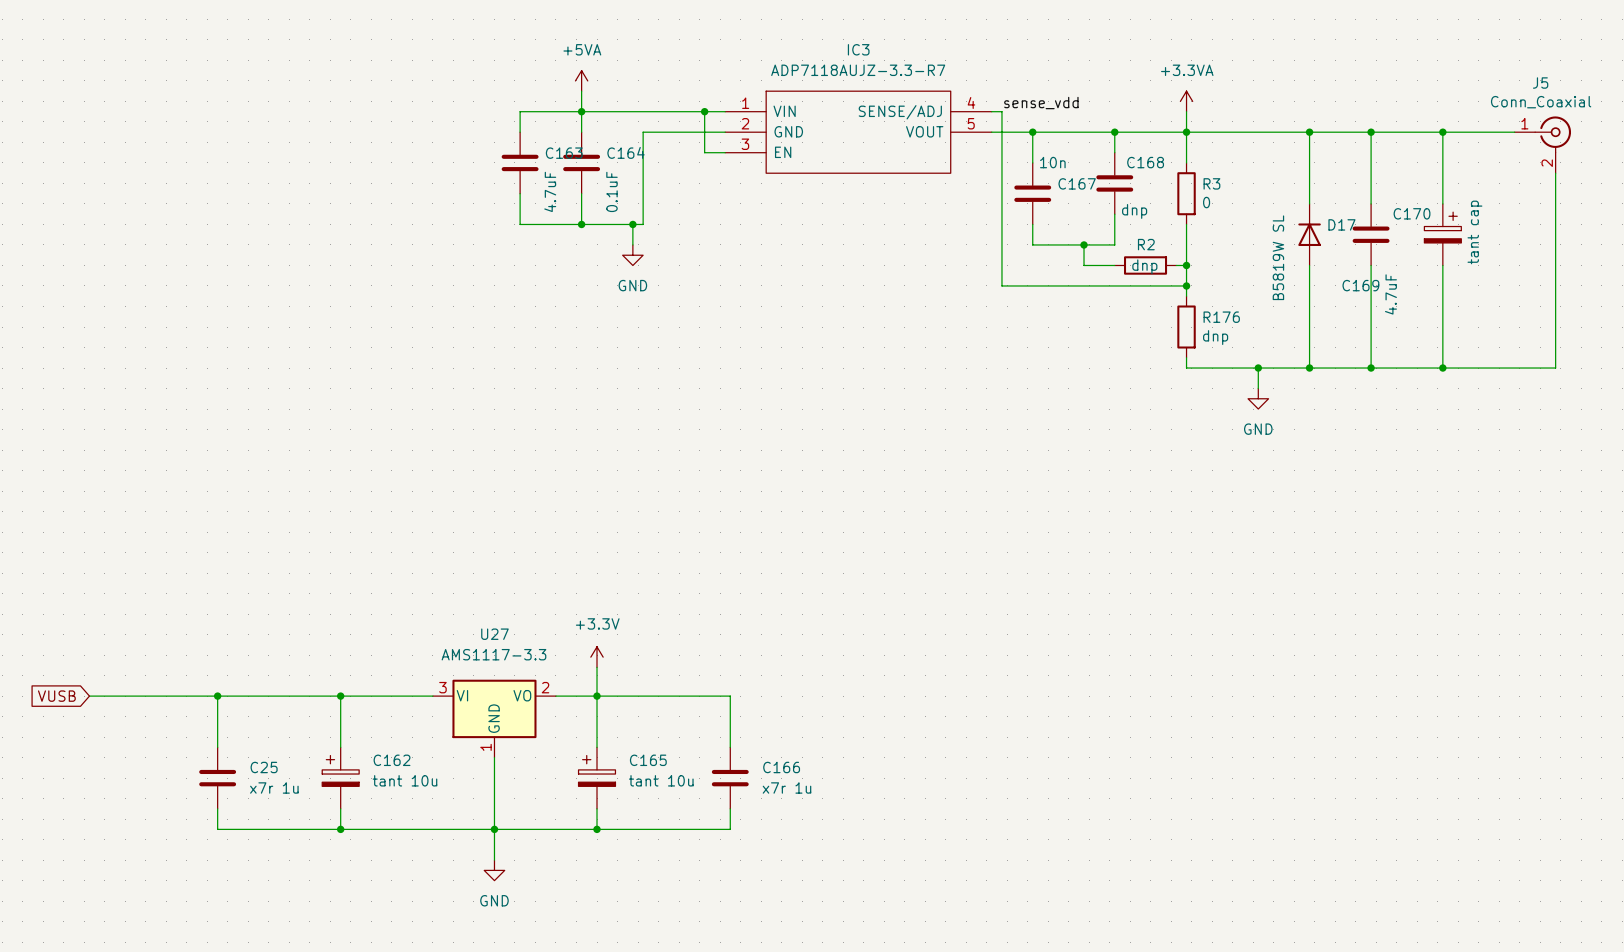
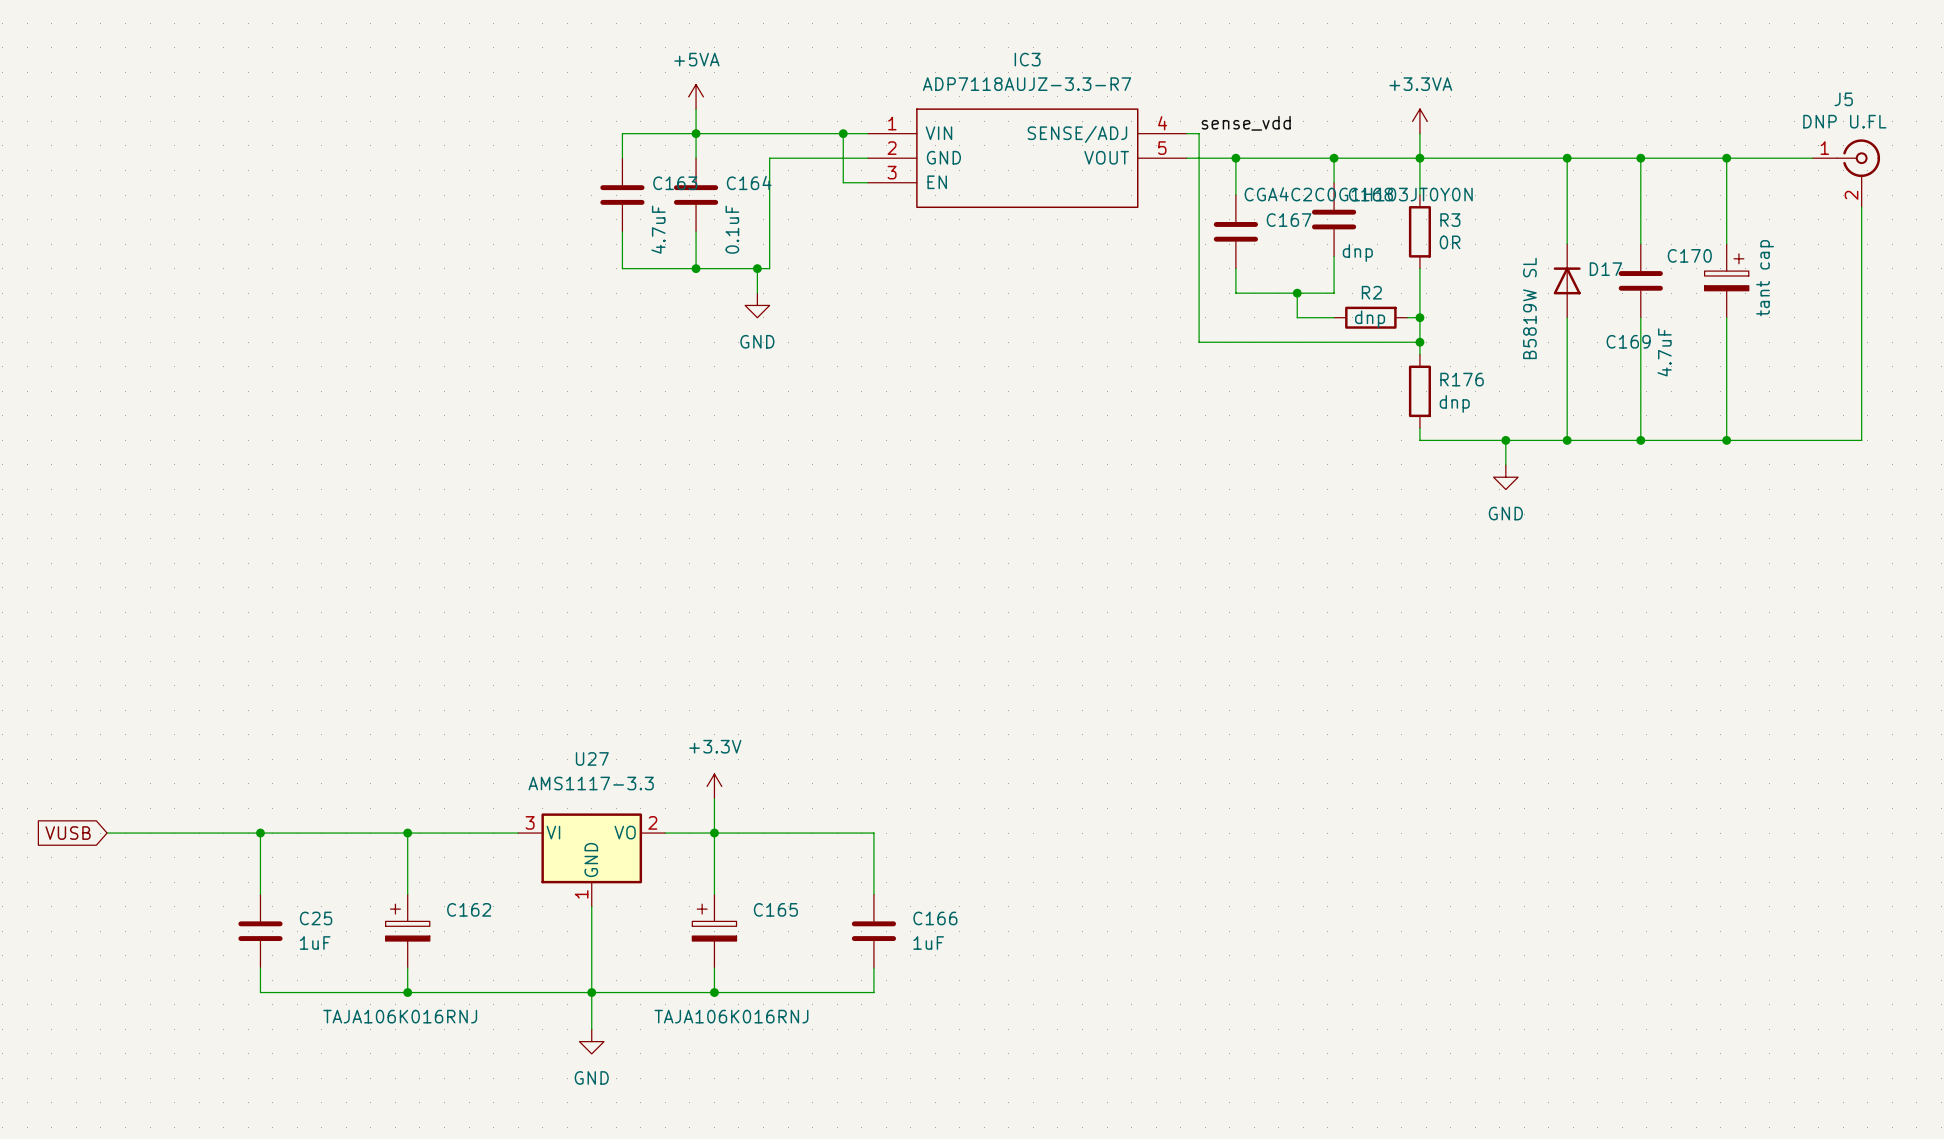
J5 value: Conn_Coaxial (1541, 102) -> DNP U.FL (1844, 121)
C167 value: 10n (1052, 162) -> CGA4C2C0G1H103JT0Y0N (1358, 194)
R3 value: 0 (1206, 202) -> 0R (1450, 242)
C162 value: tant 10u (404, 780) -> TAJA106K016RNJ (400, 1016)
C165 value: tant 10u (661, 780) -> TAJA106K016RNJ (731, 1016)
C25 value: x7r 1u (274, 787) -> 1uF (315, 943)
C166 value: x7r 1u (786, 787) -> 1uF (928, 943)

